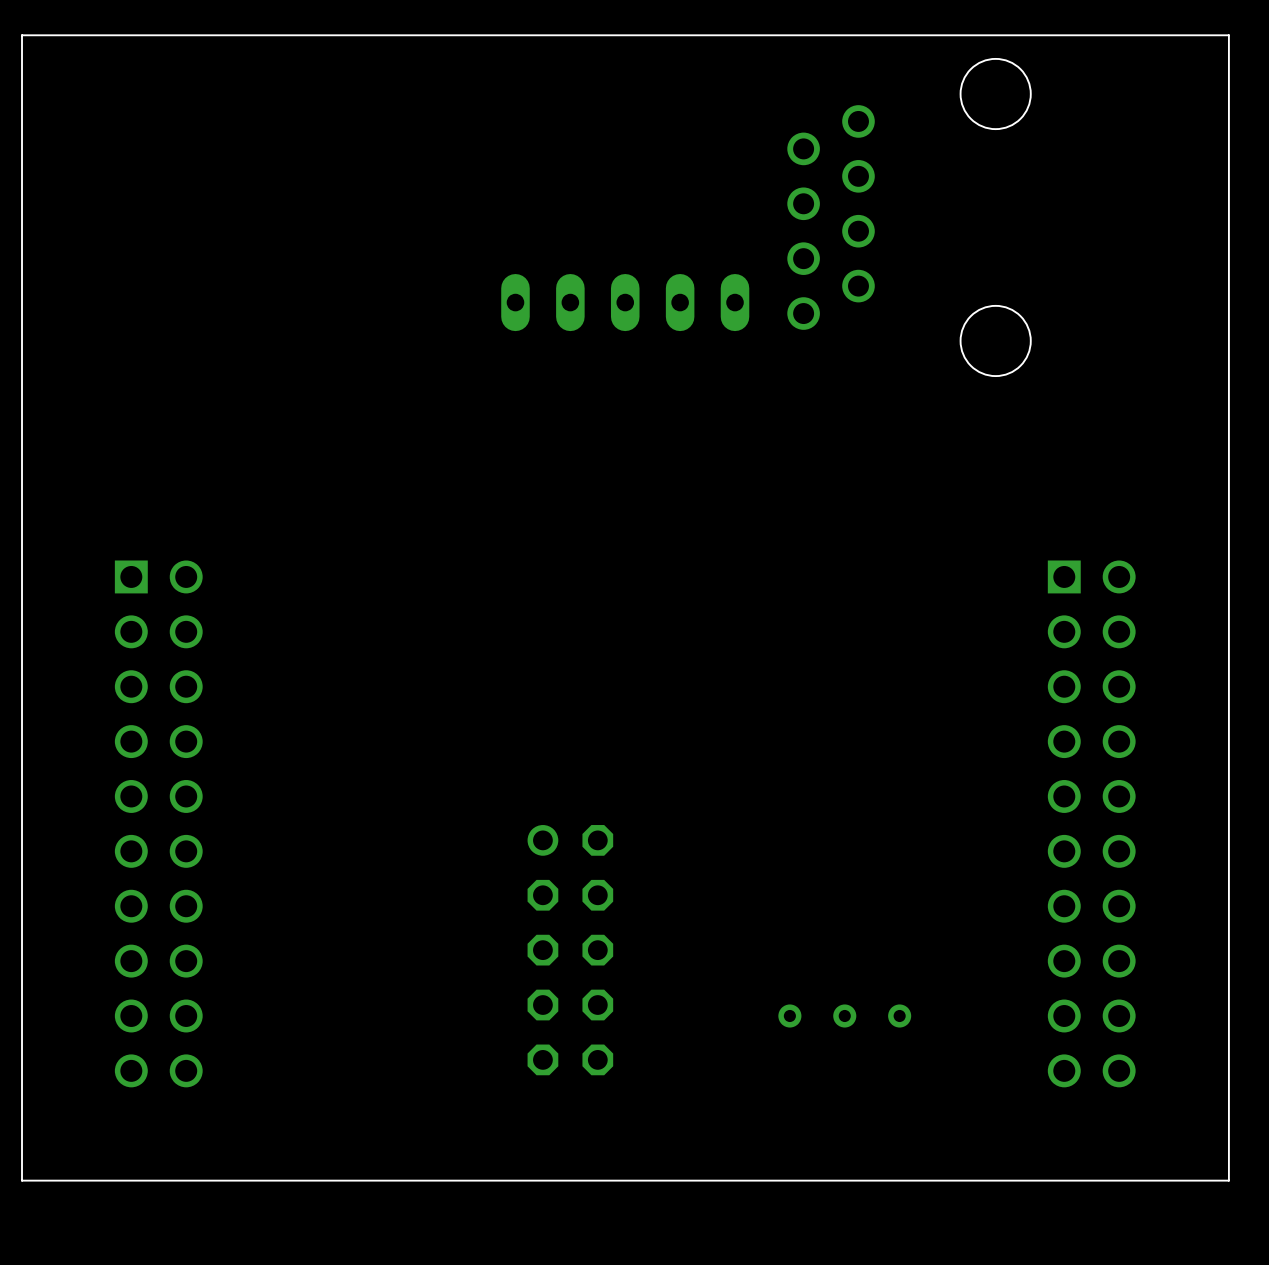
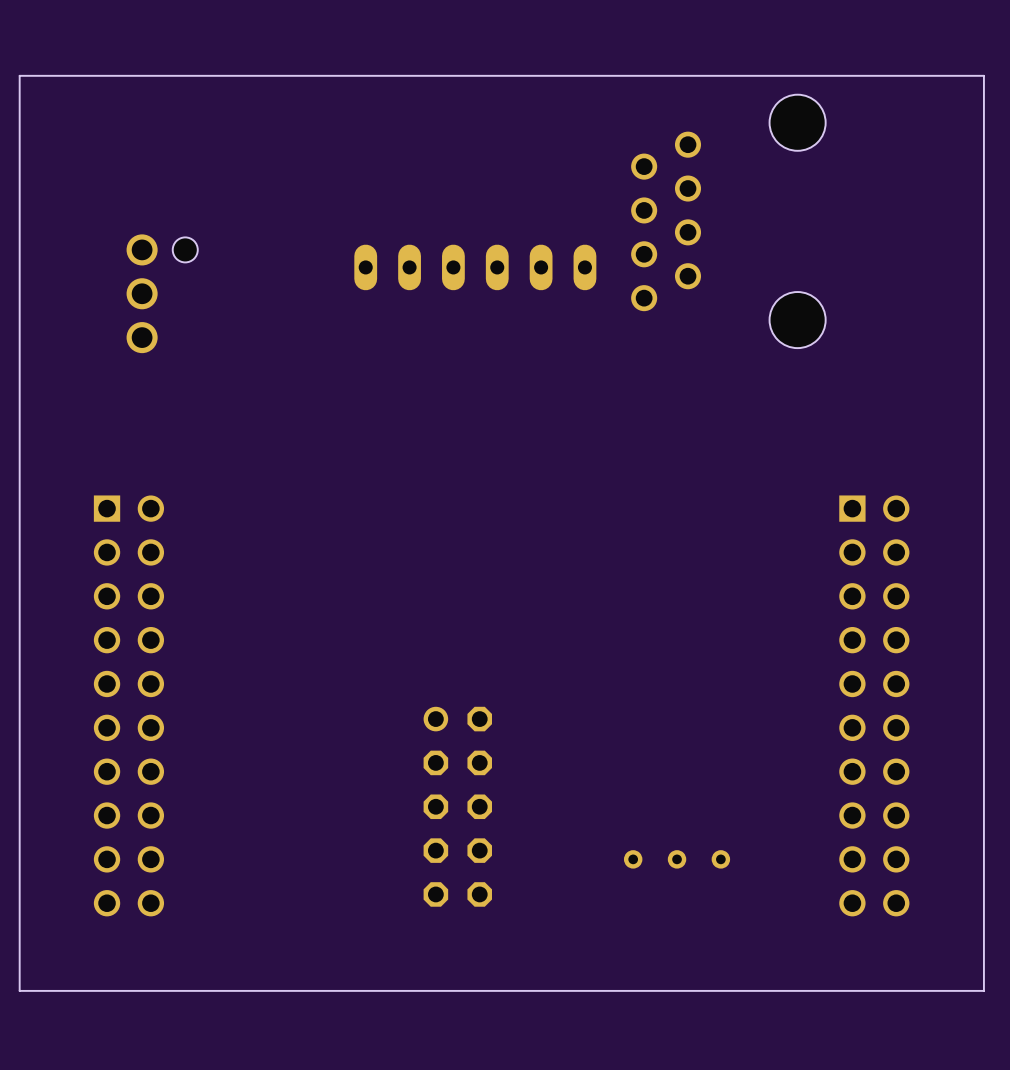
part: none -> (475, 267)
part: (625, 302) -> none
part: none -> (162, 293)

